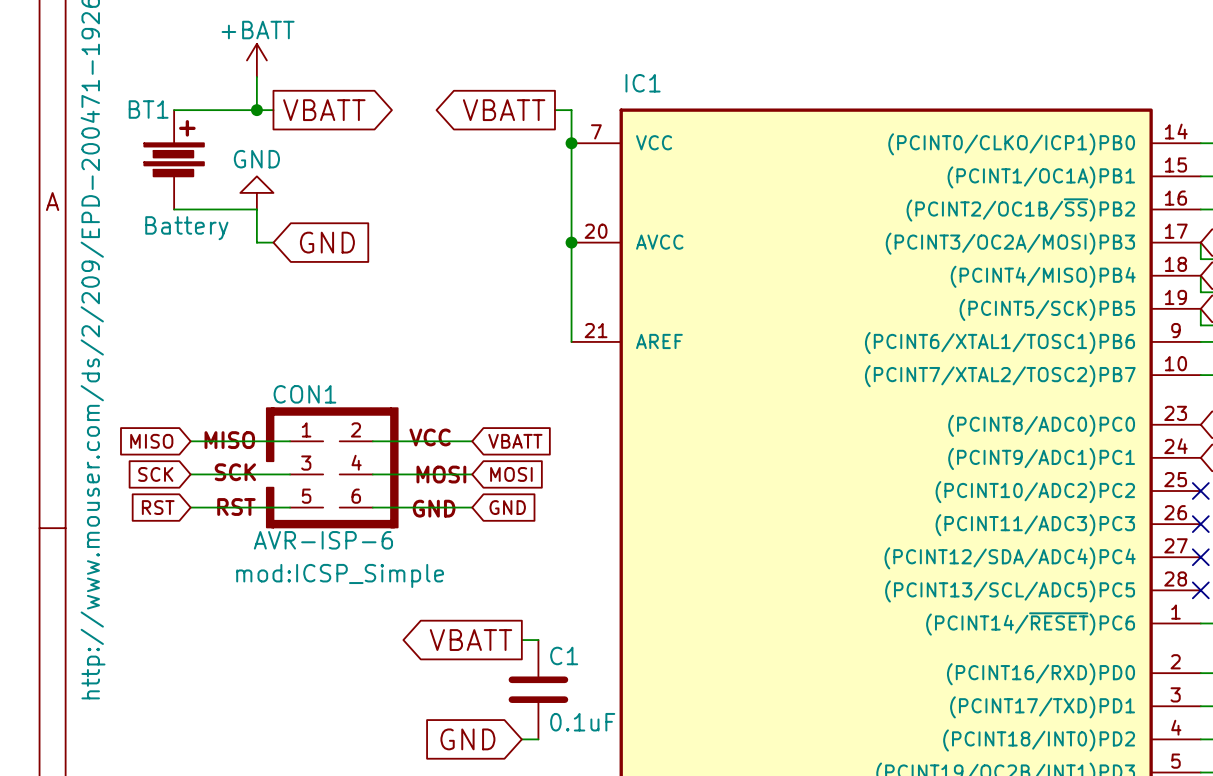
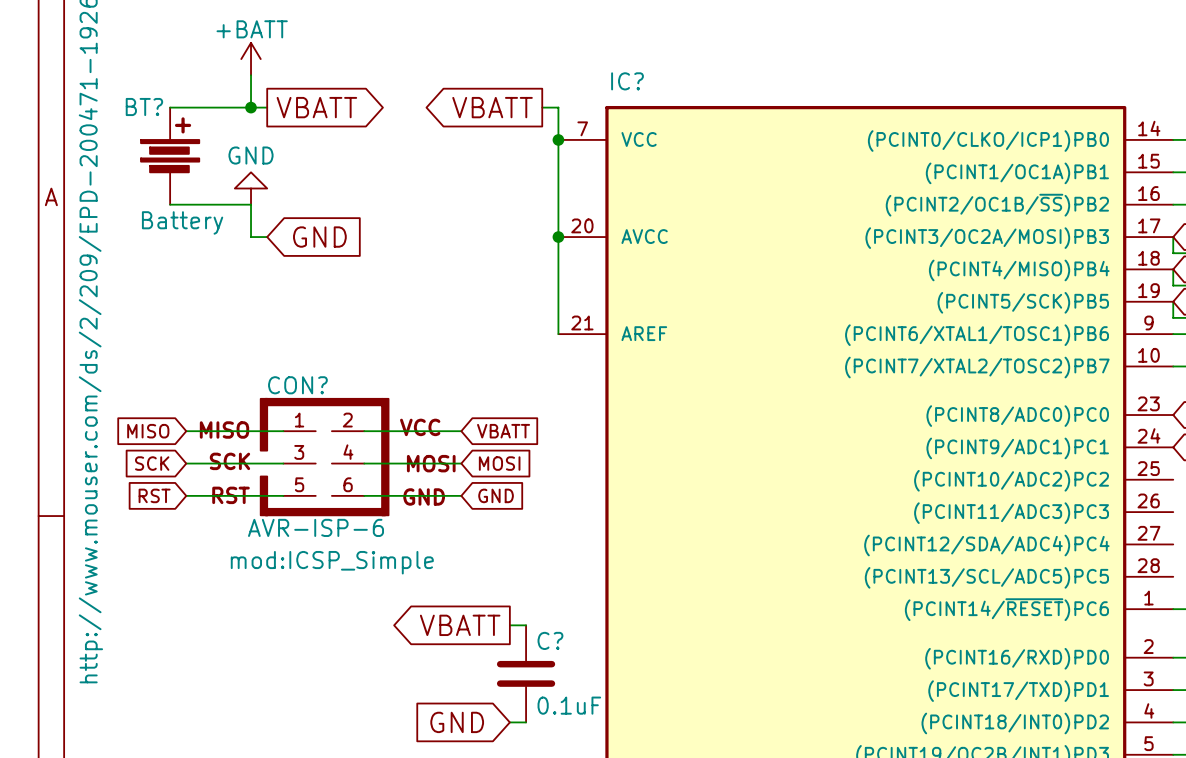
IC1 name: IC1 (643, 83) -> IC? (627, 81)
BT1 name: BT1 (148, 109) -> BT? (144, 107)
CON1 name: CON1 (304, 394) -> CON? (297, 385)
no-connect mark: (1200, 491) -> none
no-connect mark: (1200, 524) -> none
no-connect mark: (1200, 557) -> none
no-connect mark: (1200, 590) -> none
C1 name: C1 (564, 655) -> C? (550, 640)

